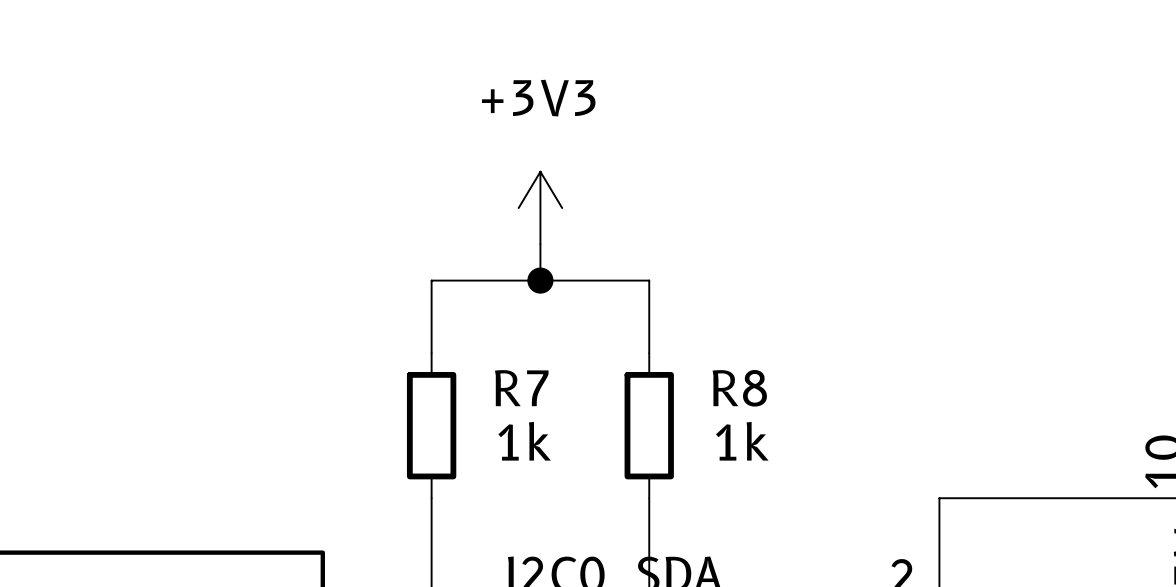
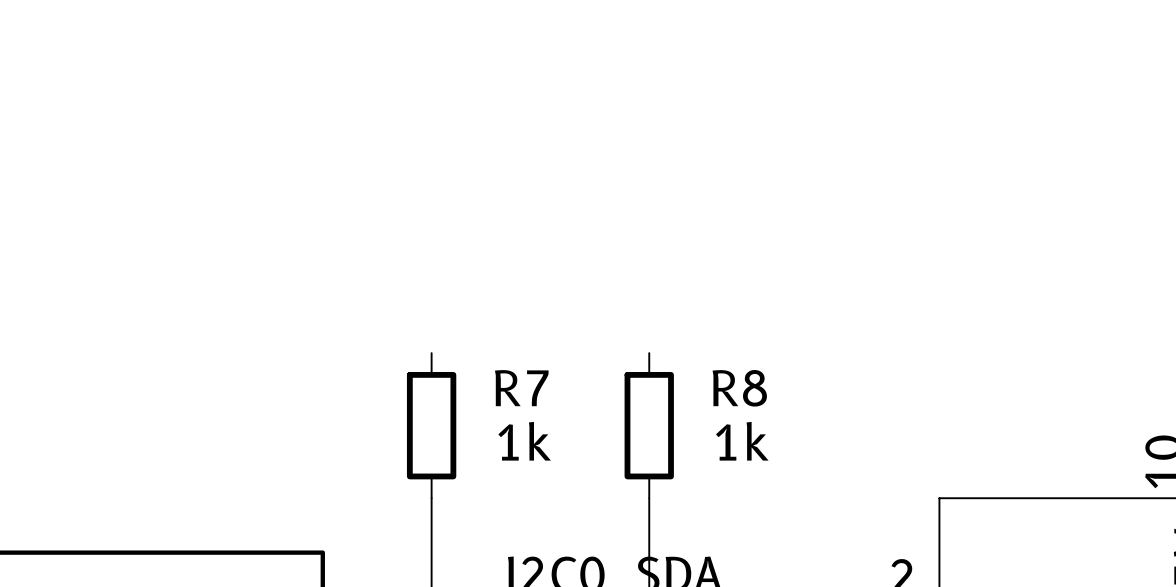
power symbol: +3V3 (540, 208) -> none
wire: (540, 244) (540, 280) -> none
junction: (540, 280) -> none
wire: (431, 353) (431, 280) (649, 280) (649, 353) -> none

